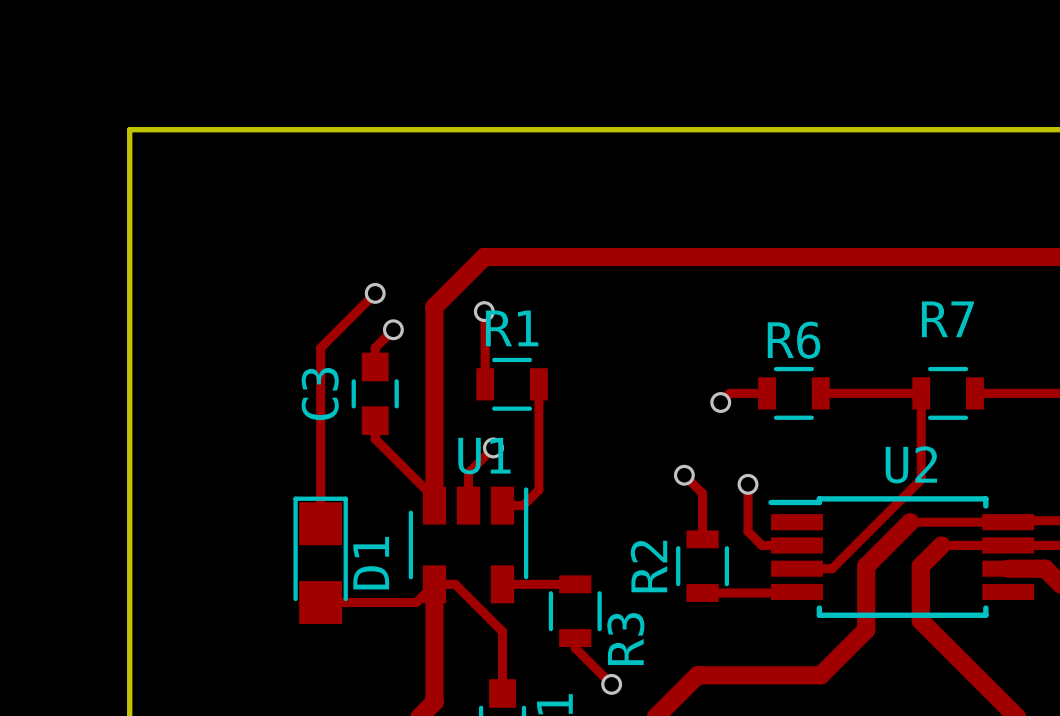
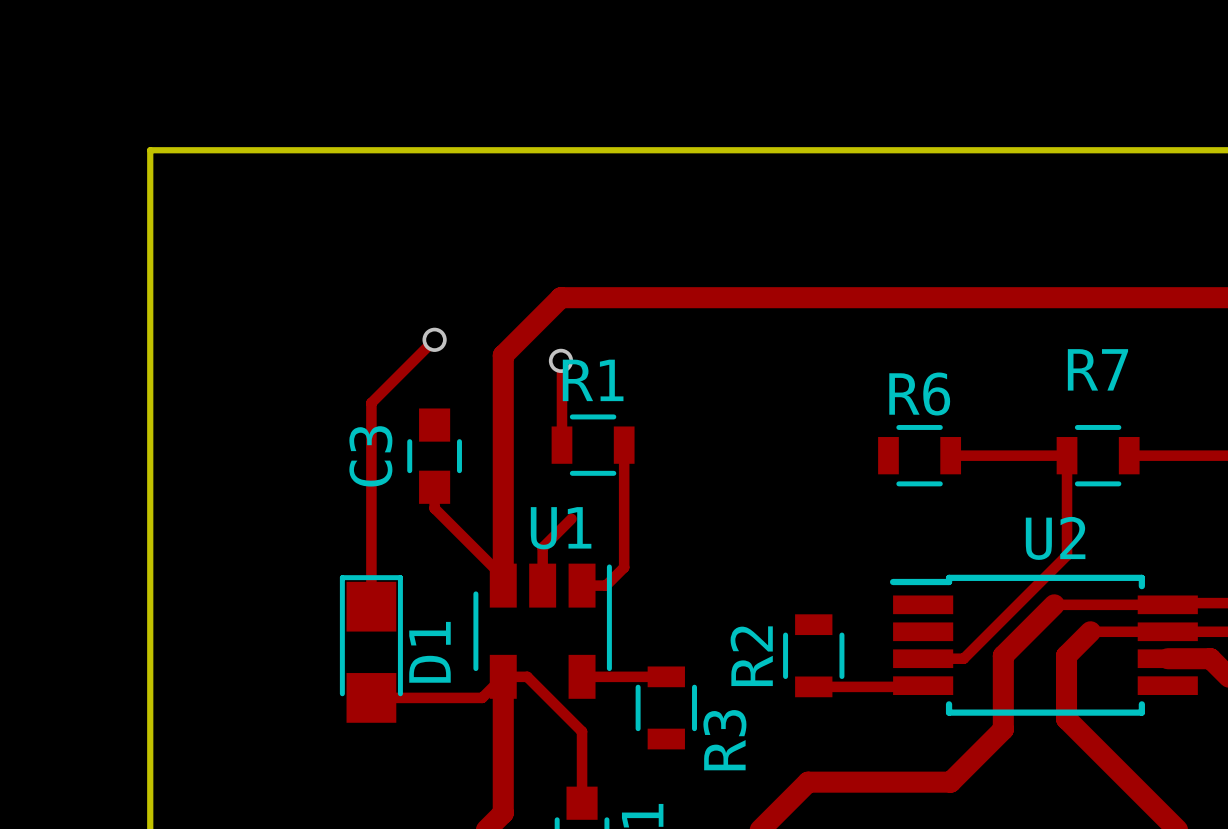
track: (393, 329) (375, 347) (375, 366) -> none
via: (393, 329) -> none
track: (767, 393) (729, 393) (720, 402) -> none
via: (720, 402) -> none
via: (493, 447) -> none
track: (684, 475) (702, 493) (702, 539) -> none
via: (684, 475) -> none
track: (748, 484) (748, 531) (761, 545) (797, 545) -> none
via: (748, 484) -> none
track: (575, 638) (575, 648) (611, 684) -> none
via: (611, 684) -> none

